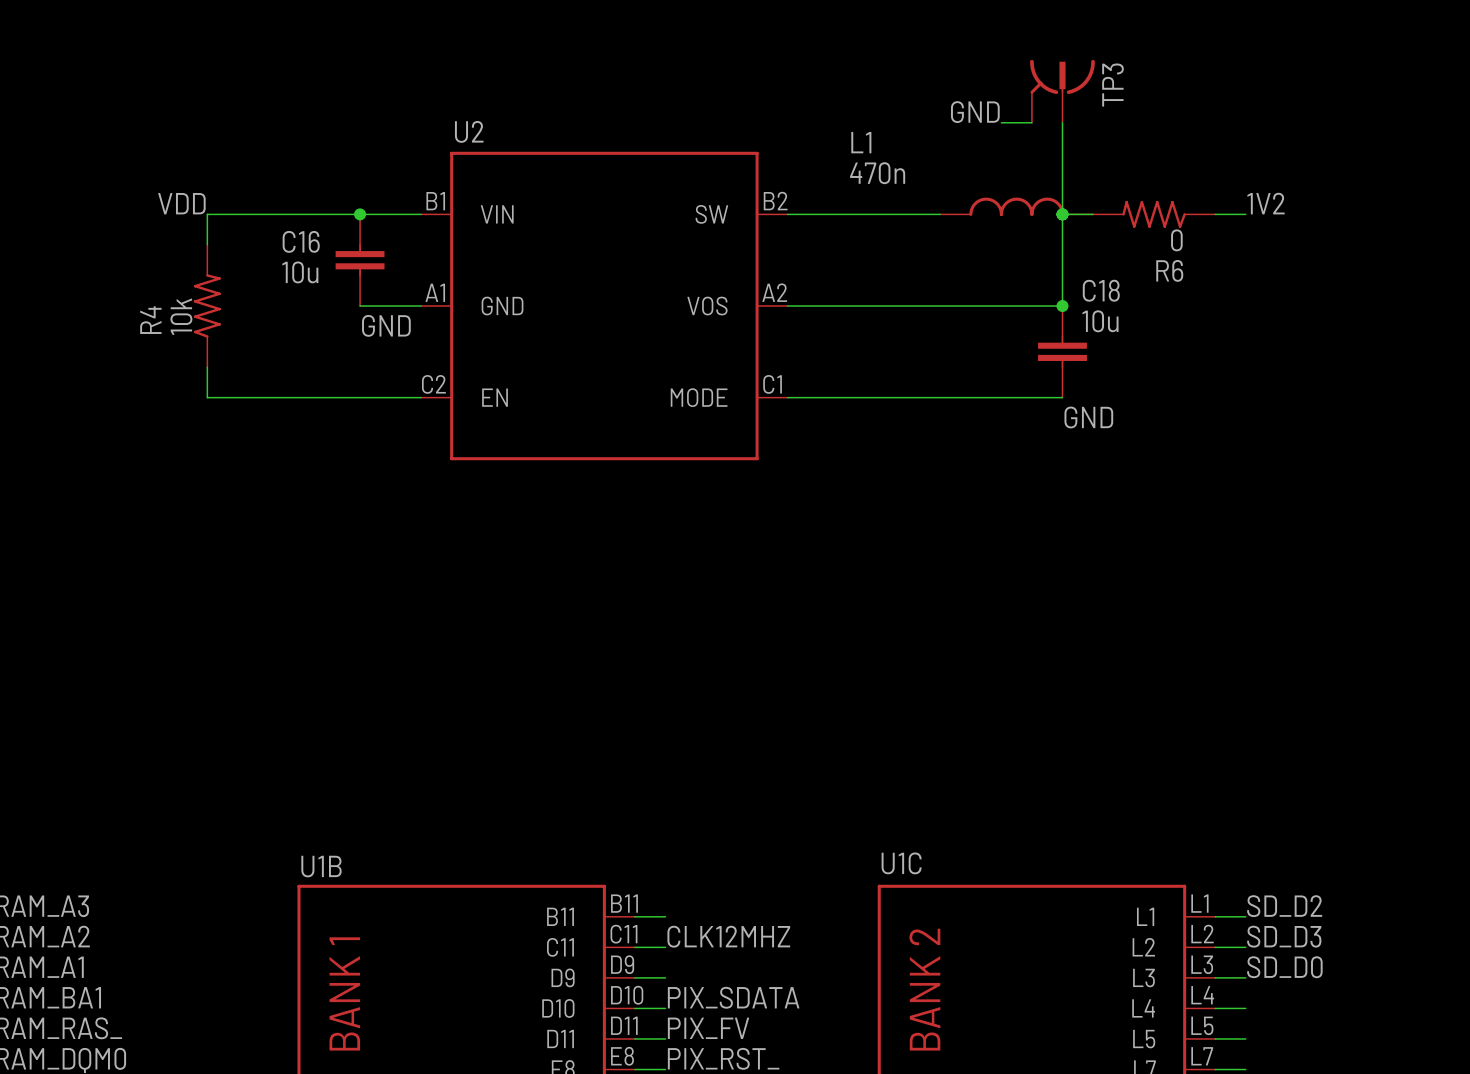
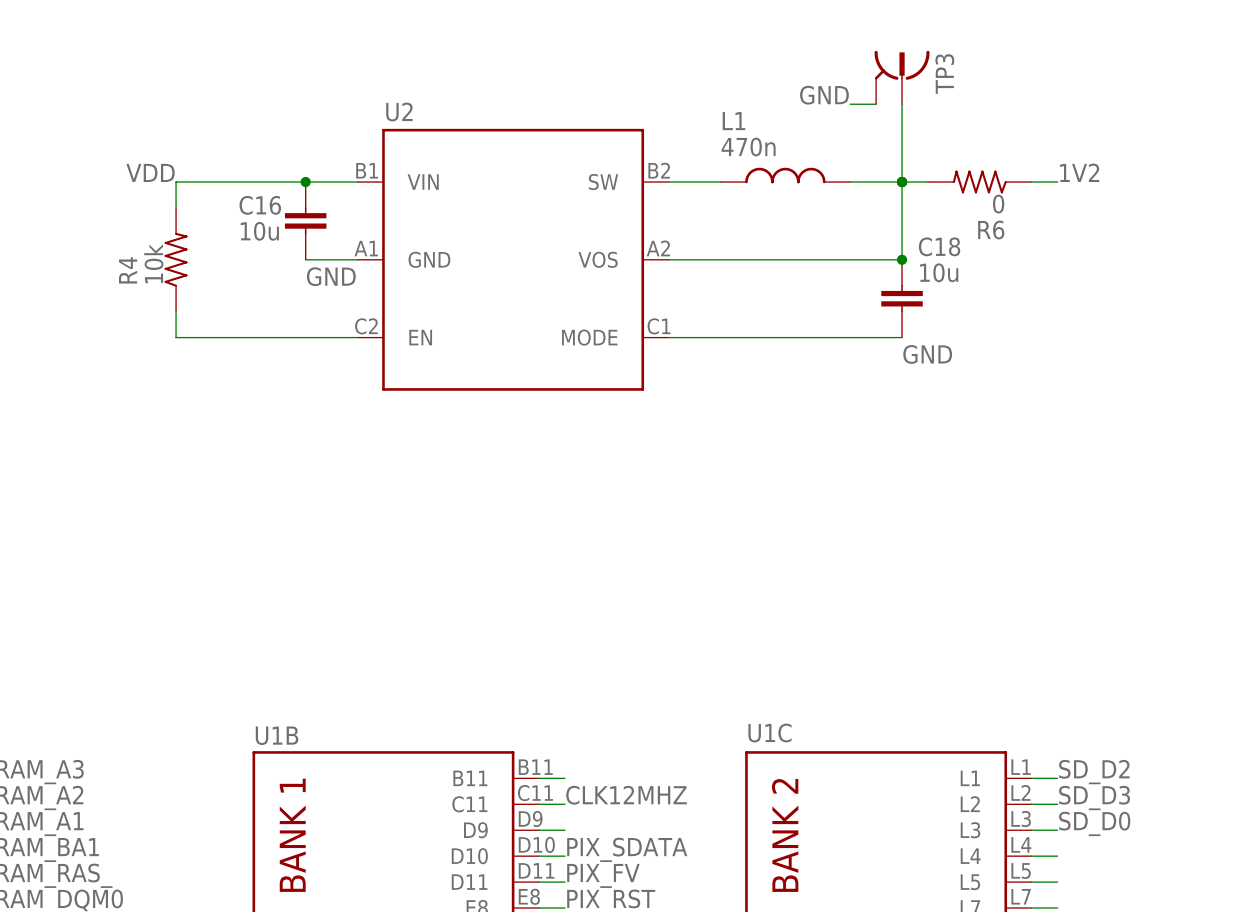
L1 position: (1016, 206) -> (785, 175)
wire: (848, 214) (940, 214) -> none
wire: none -> (850, 182) (902, 182)

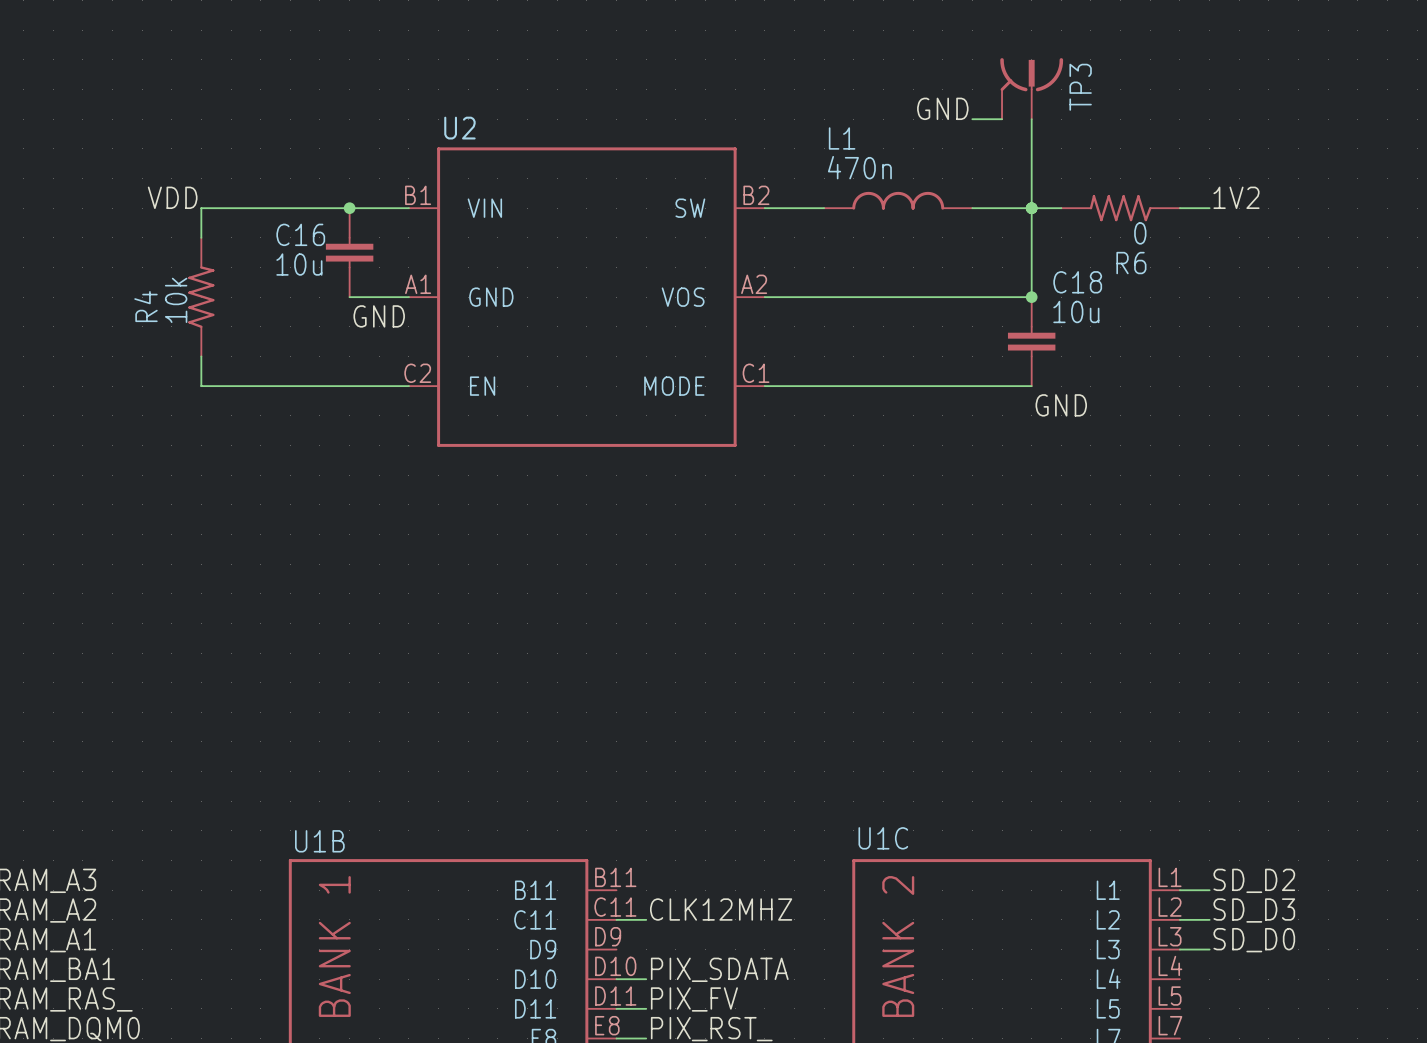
wire: (539, 778) (564, 778) -> none
wire: (539, 830) (564, 830) -> none
wire: (1031, 856) (1057, 856) -> none
wire: (1031, 882) (1057, 882) -> none
wire: (1031, 908) (1057, 908) -> none

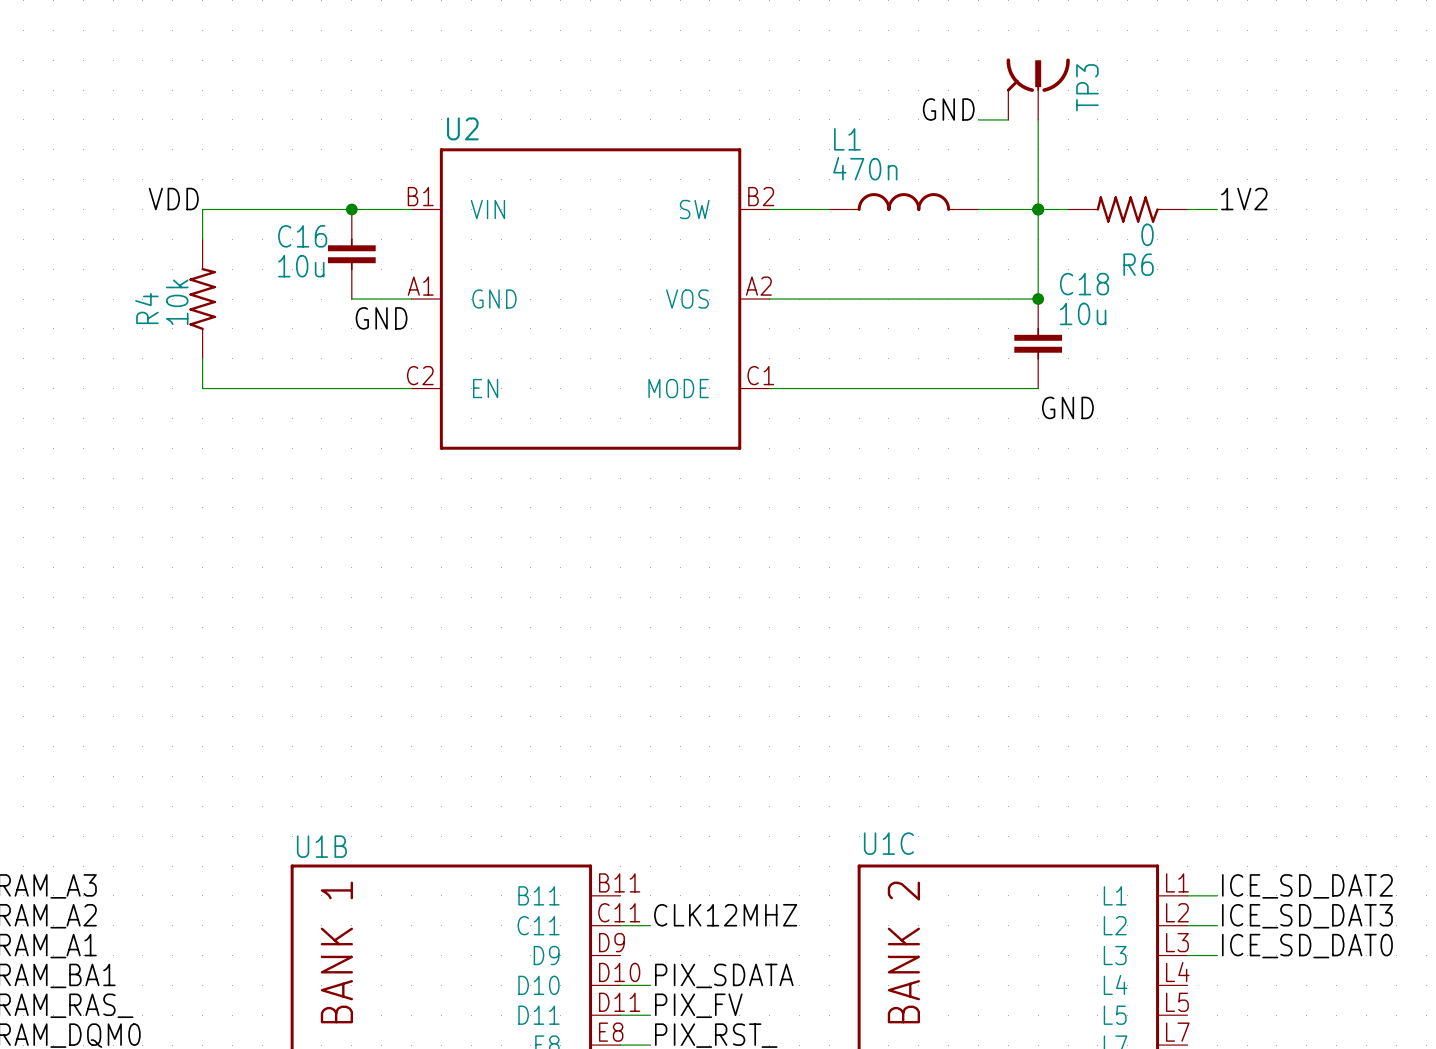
label: SD_D2 (1254, 880) -> ICE_SD_DAT2 (1307, 886)
label: SD_D3 (1254, 910) -> ICE_SD_DAT3 (1307, 916)
label: SD_D0 (1254, 940) -> ICE_SD_DAT0 (1307, 946)

